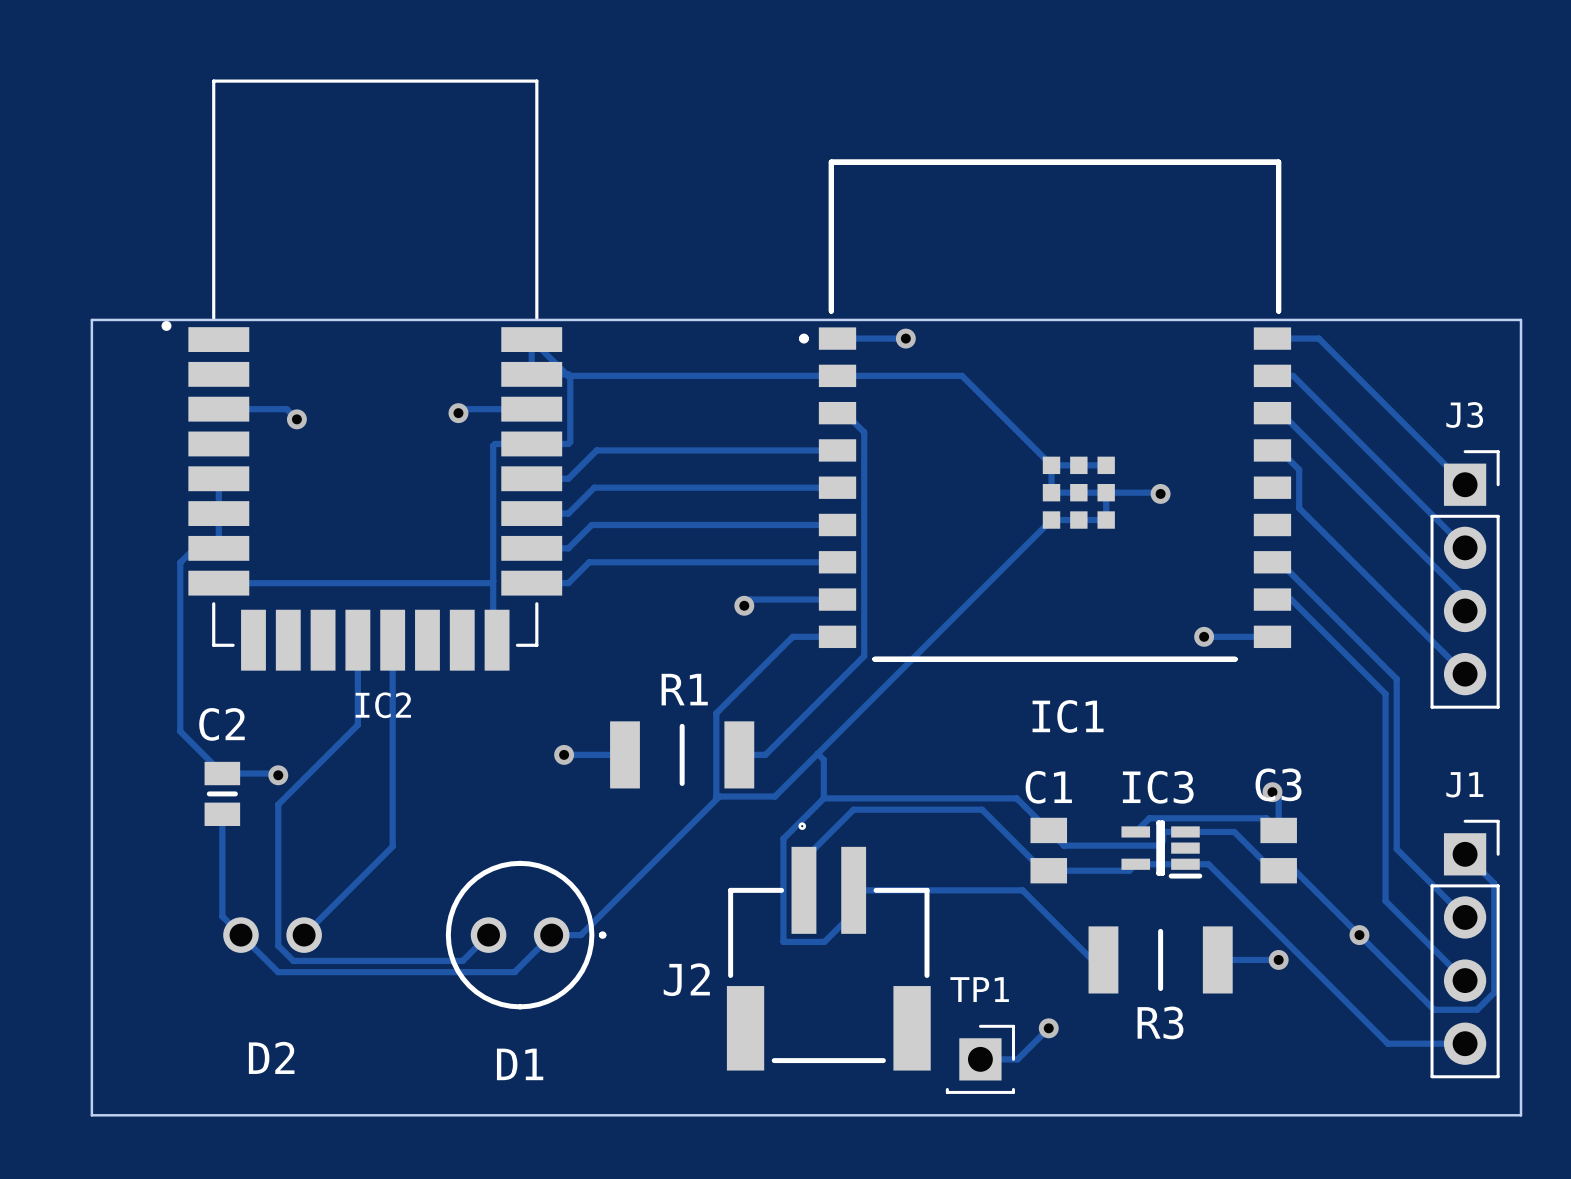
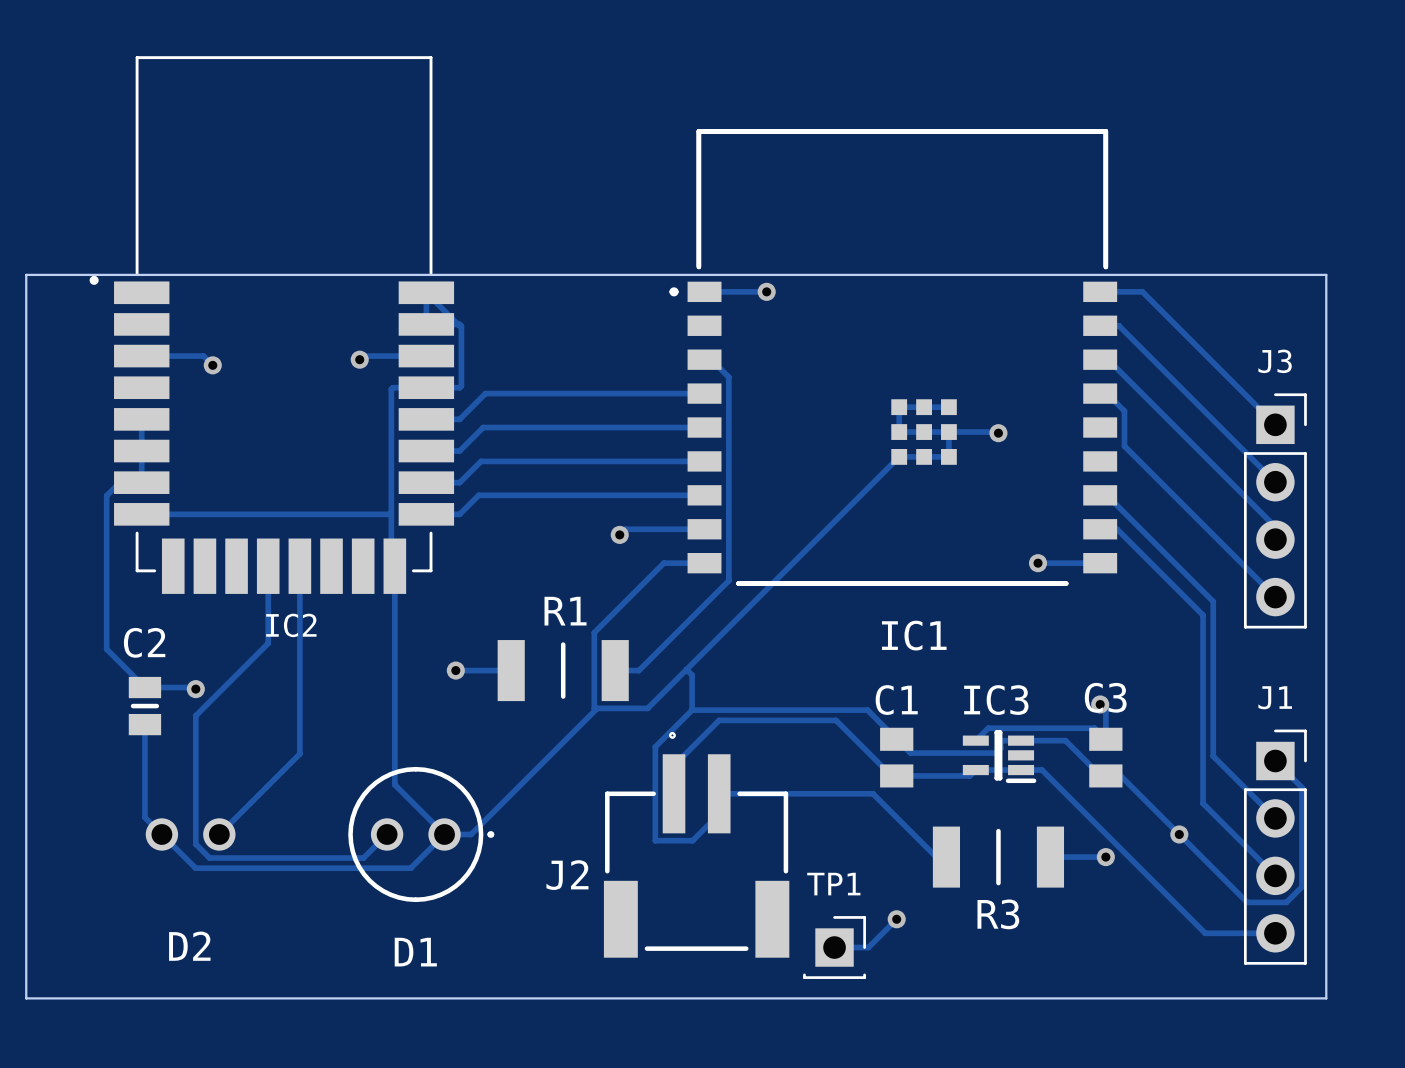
track: (568, 375) (962, 375) (1051, 465) -> none
track: none -> (394, 566) (394, 784) (444, 834)

